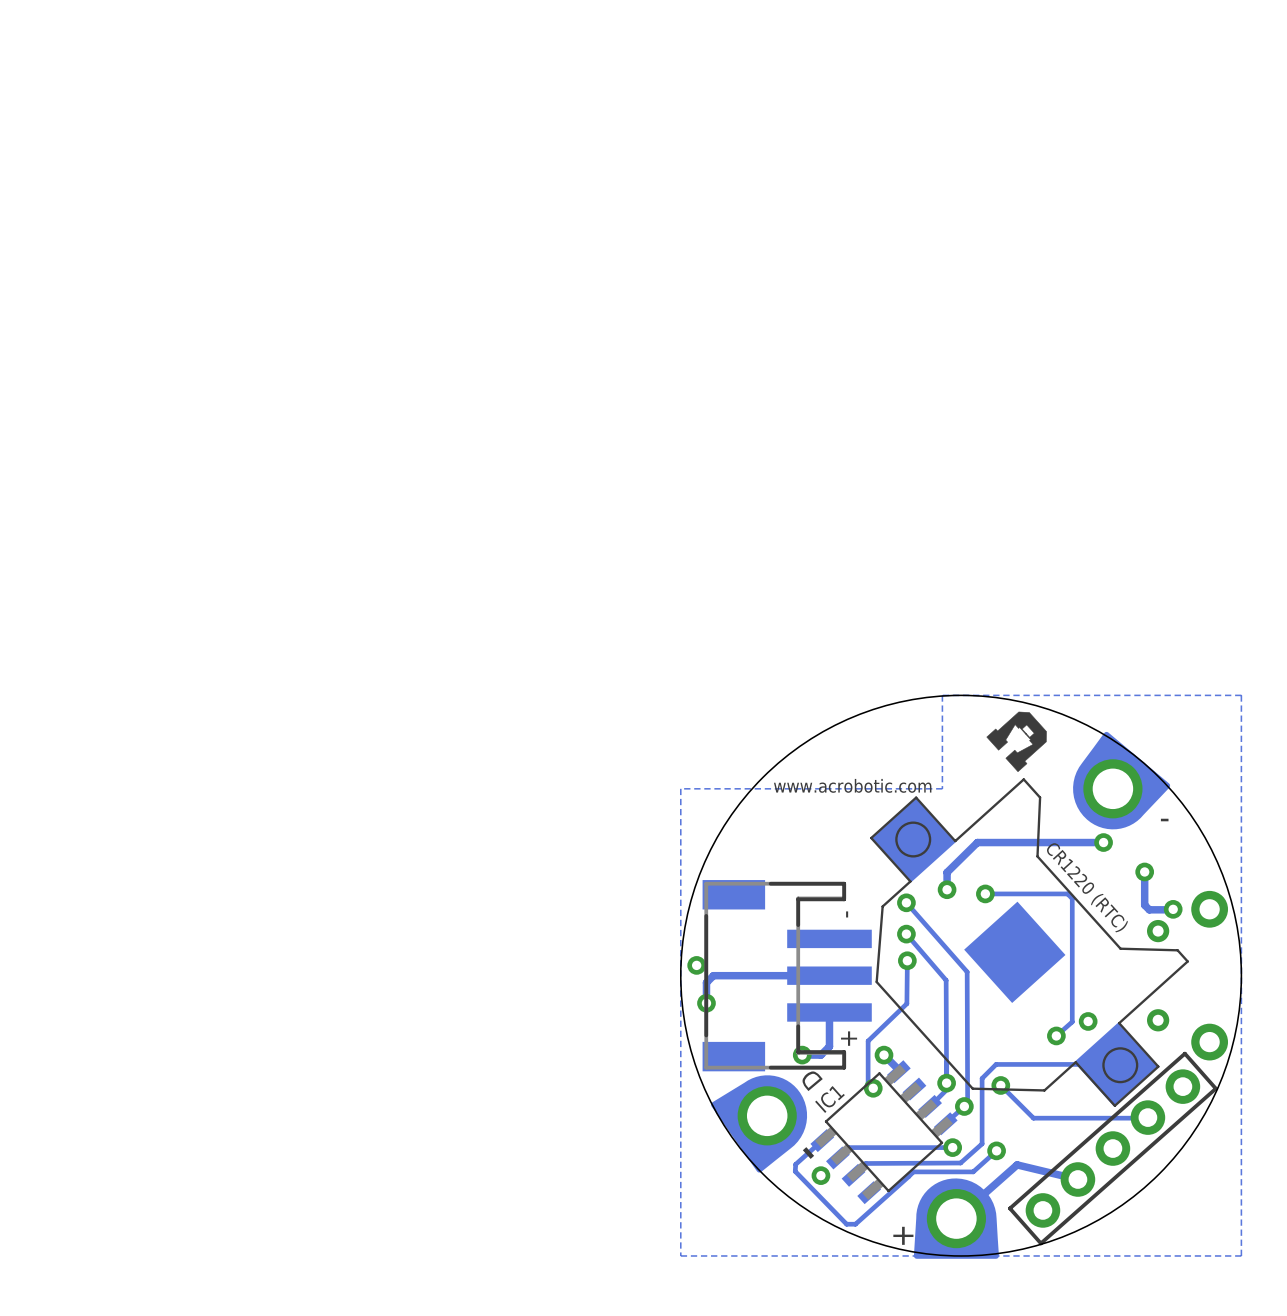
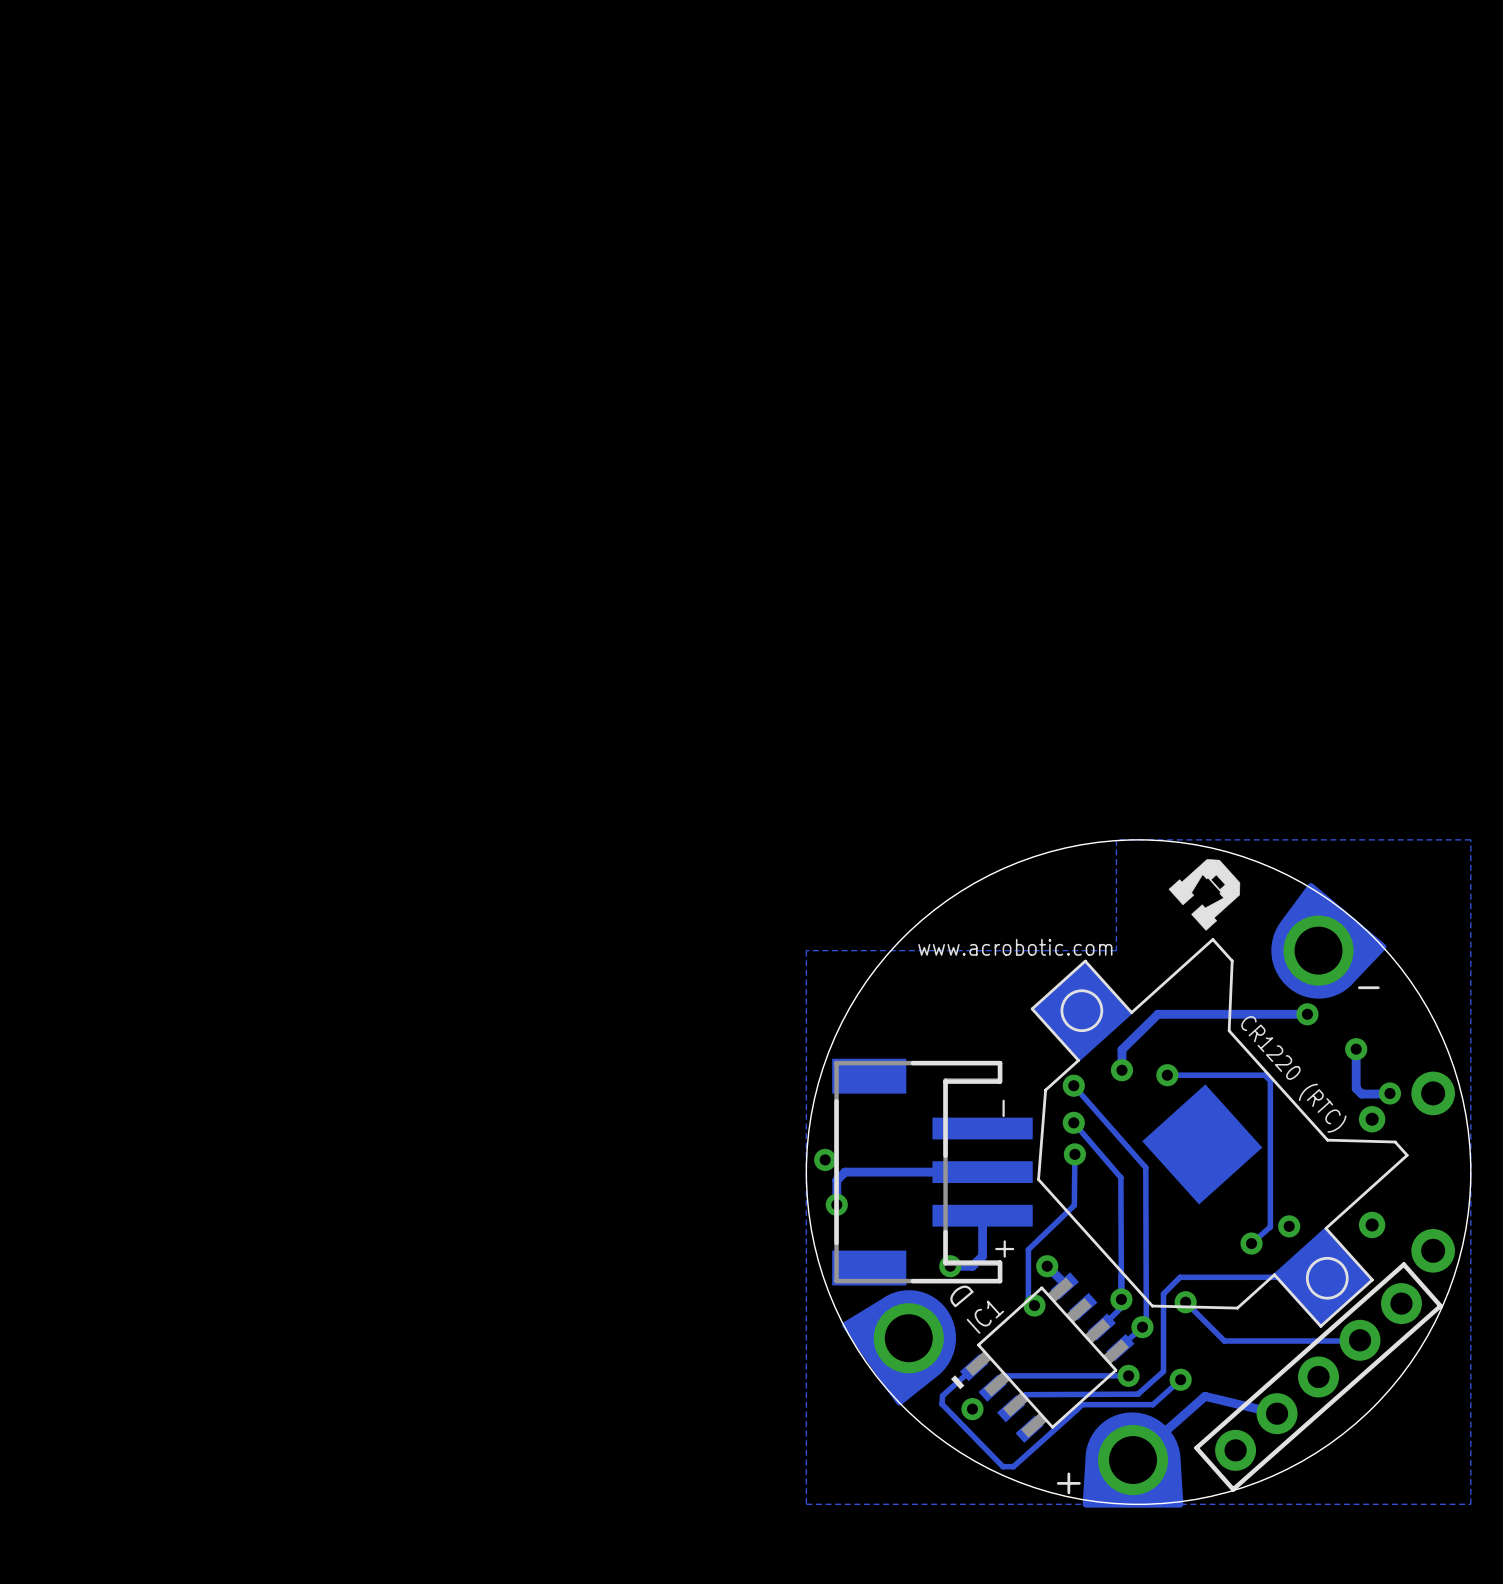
part footprint: [702, 880, 872, 1072] -> [832, 1058, 1033, 1286]

